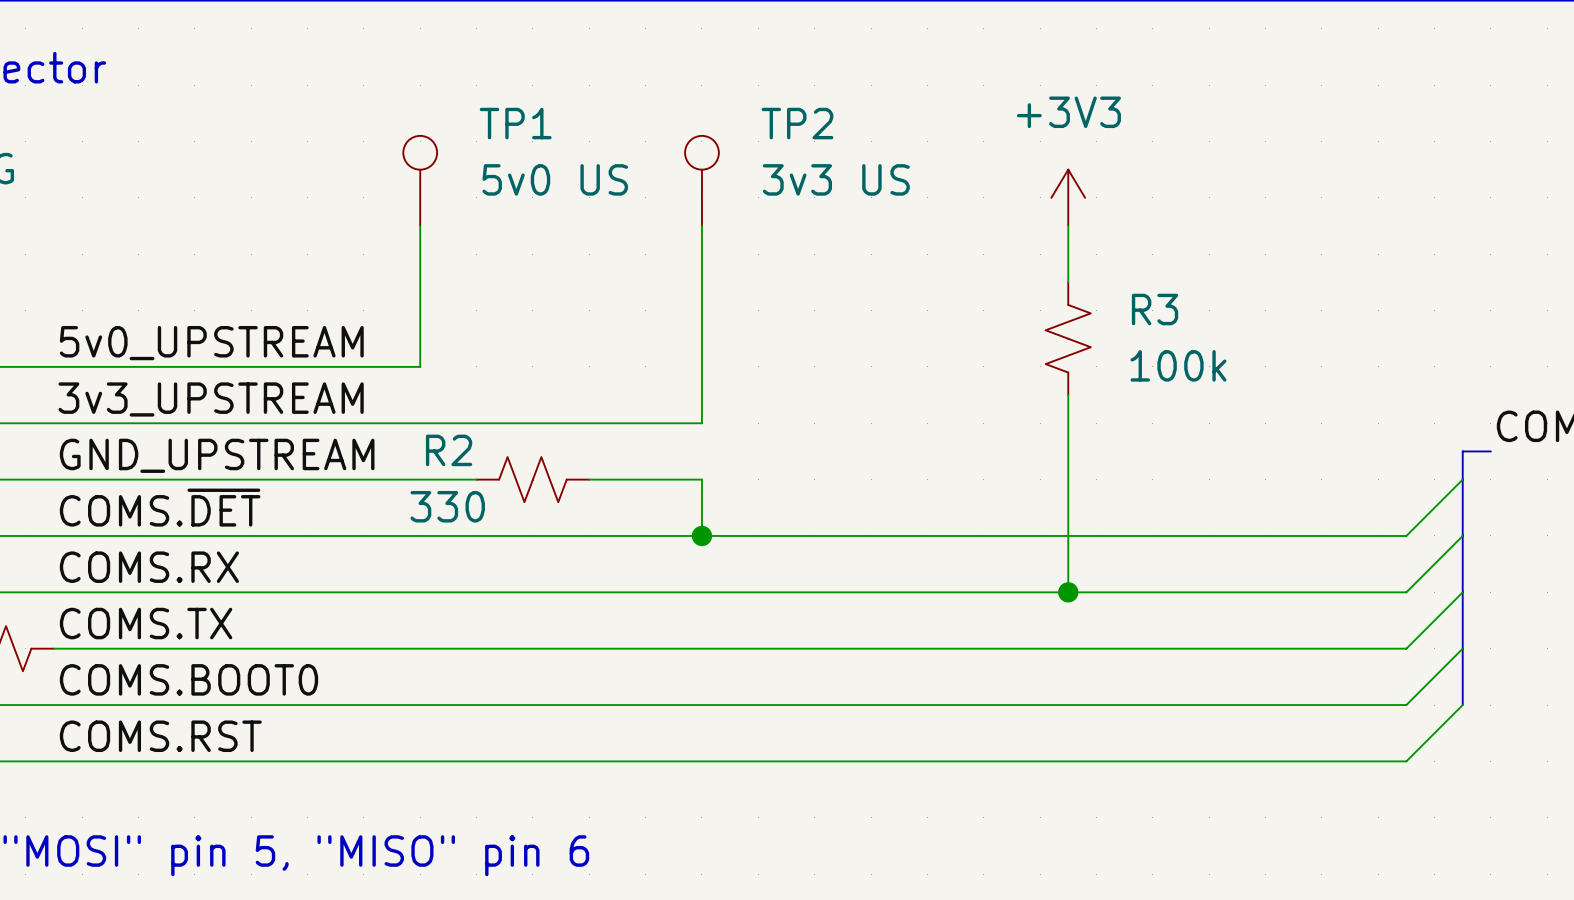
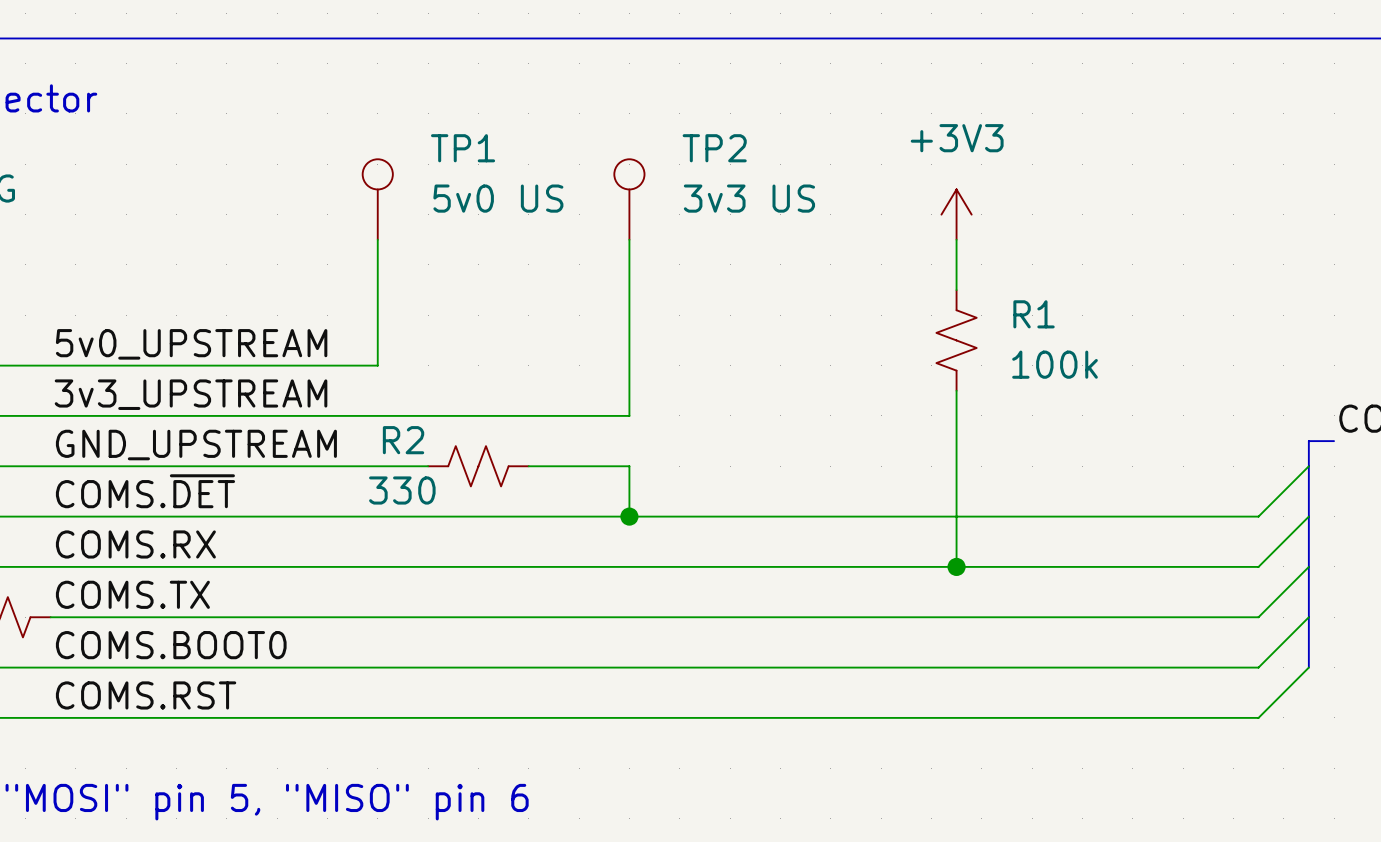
R3 name: R3 (1155, 309) -> R1 (1034, 314)

